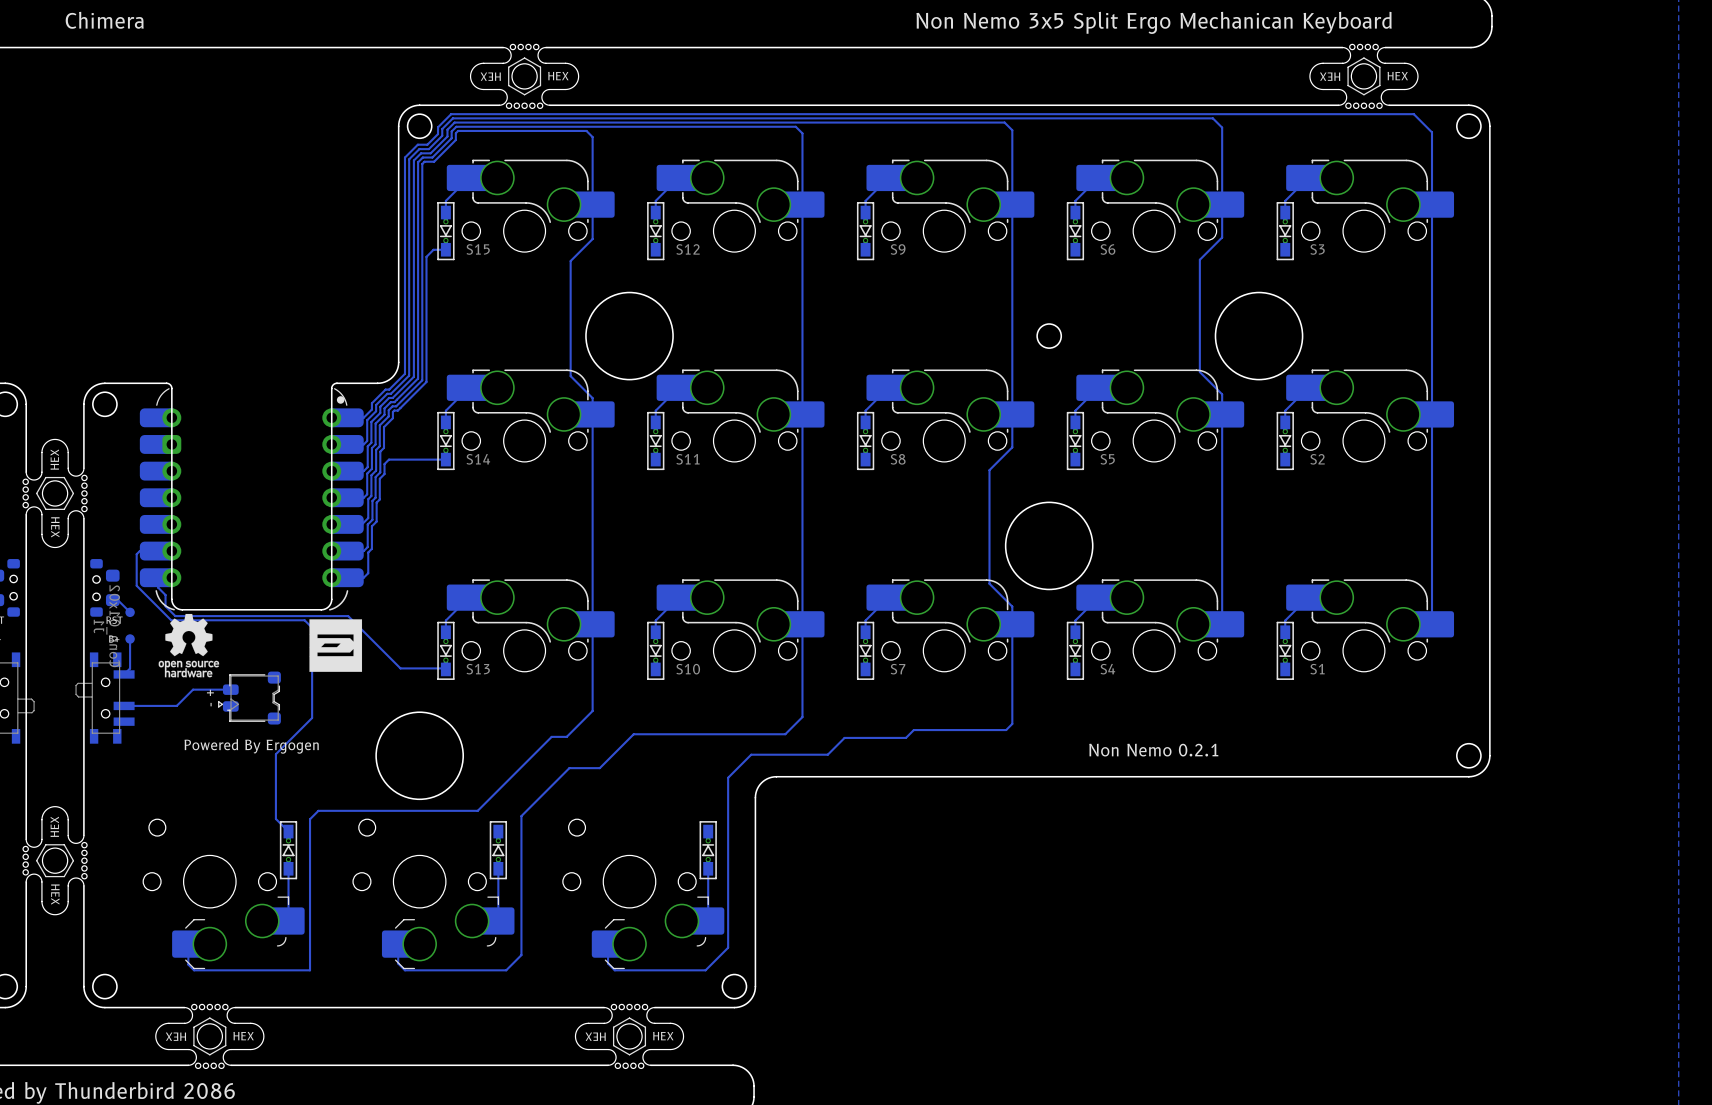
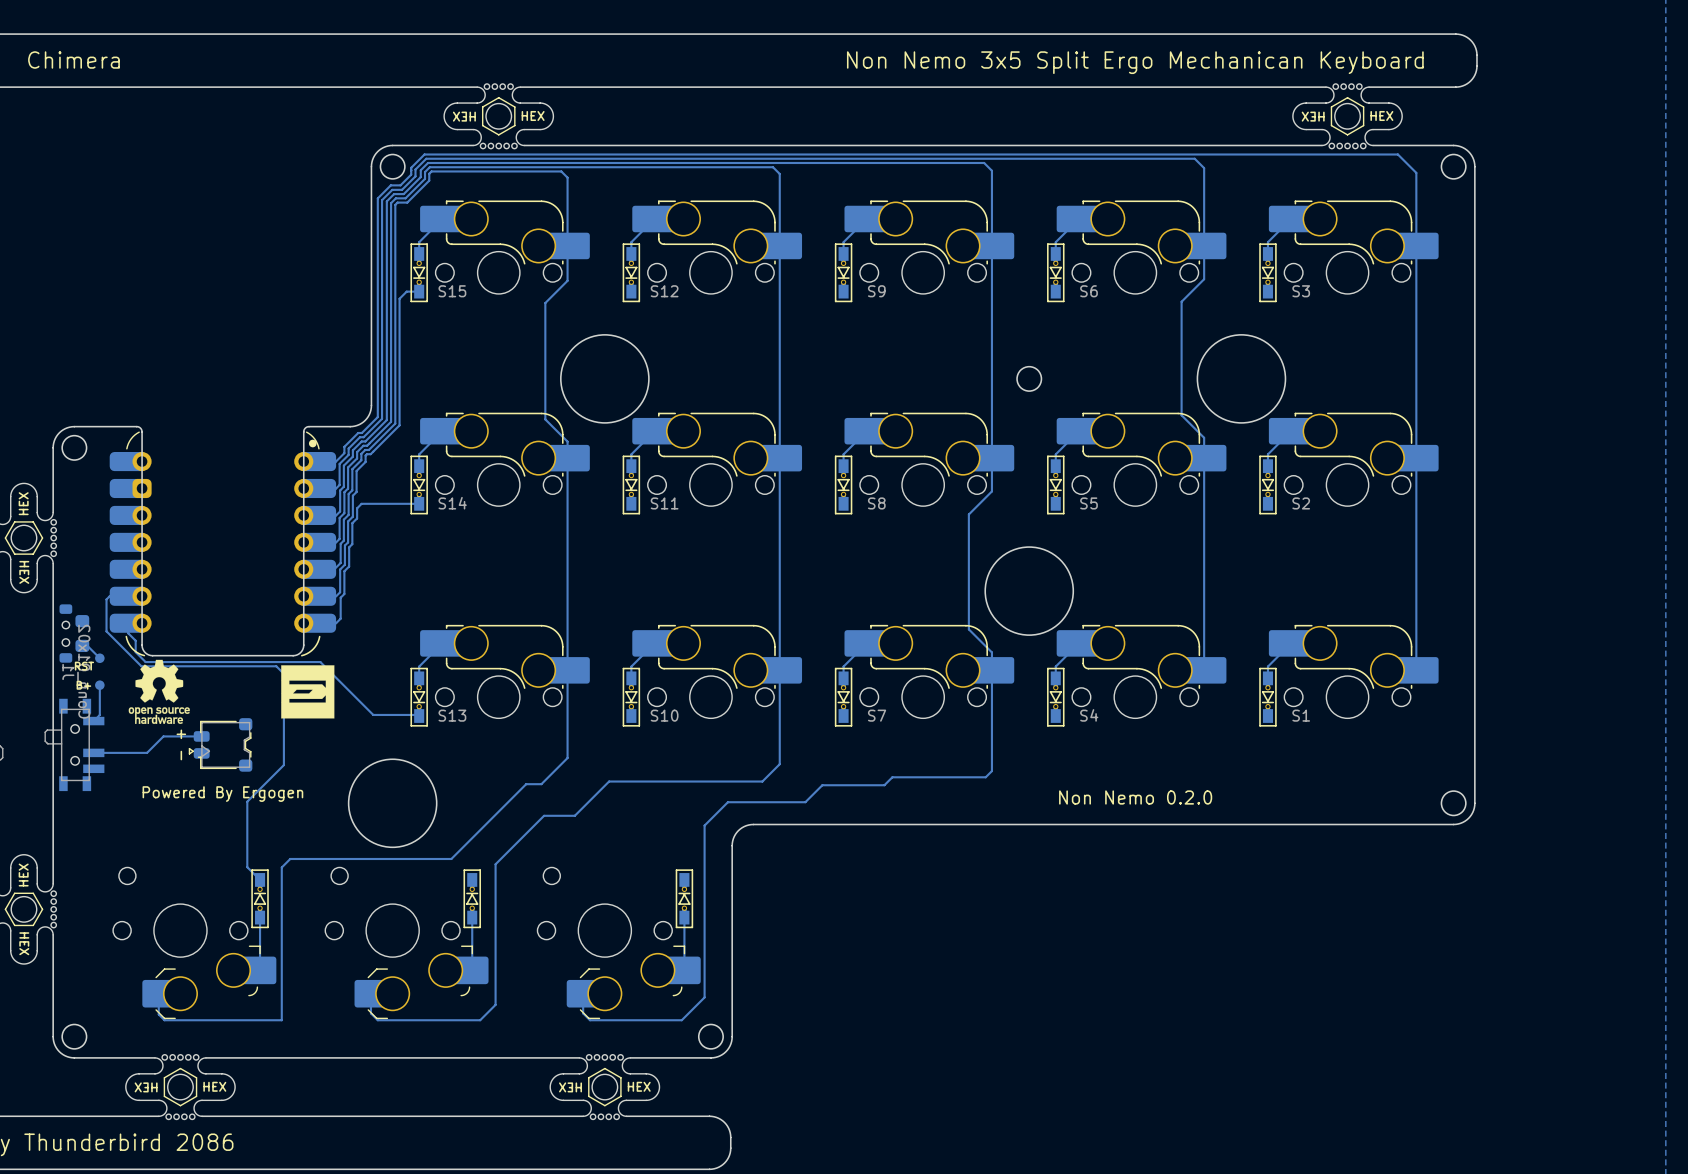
text: Non Nemo 0.2.1 (1153, 750) -> Non Nemo 0.2.0 (1135, 797)

